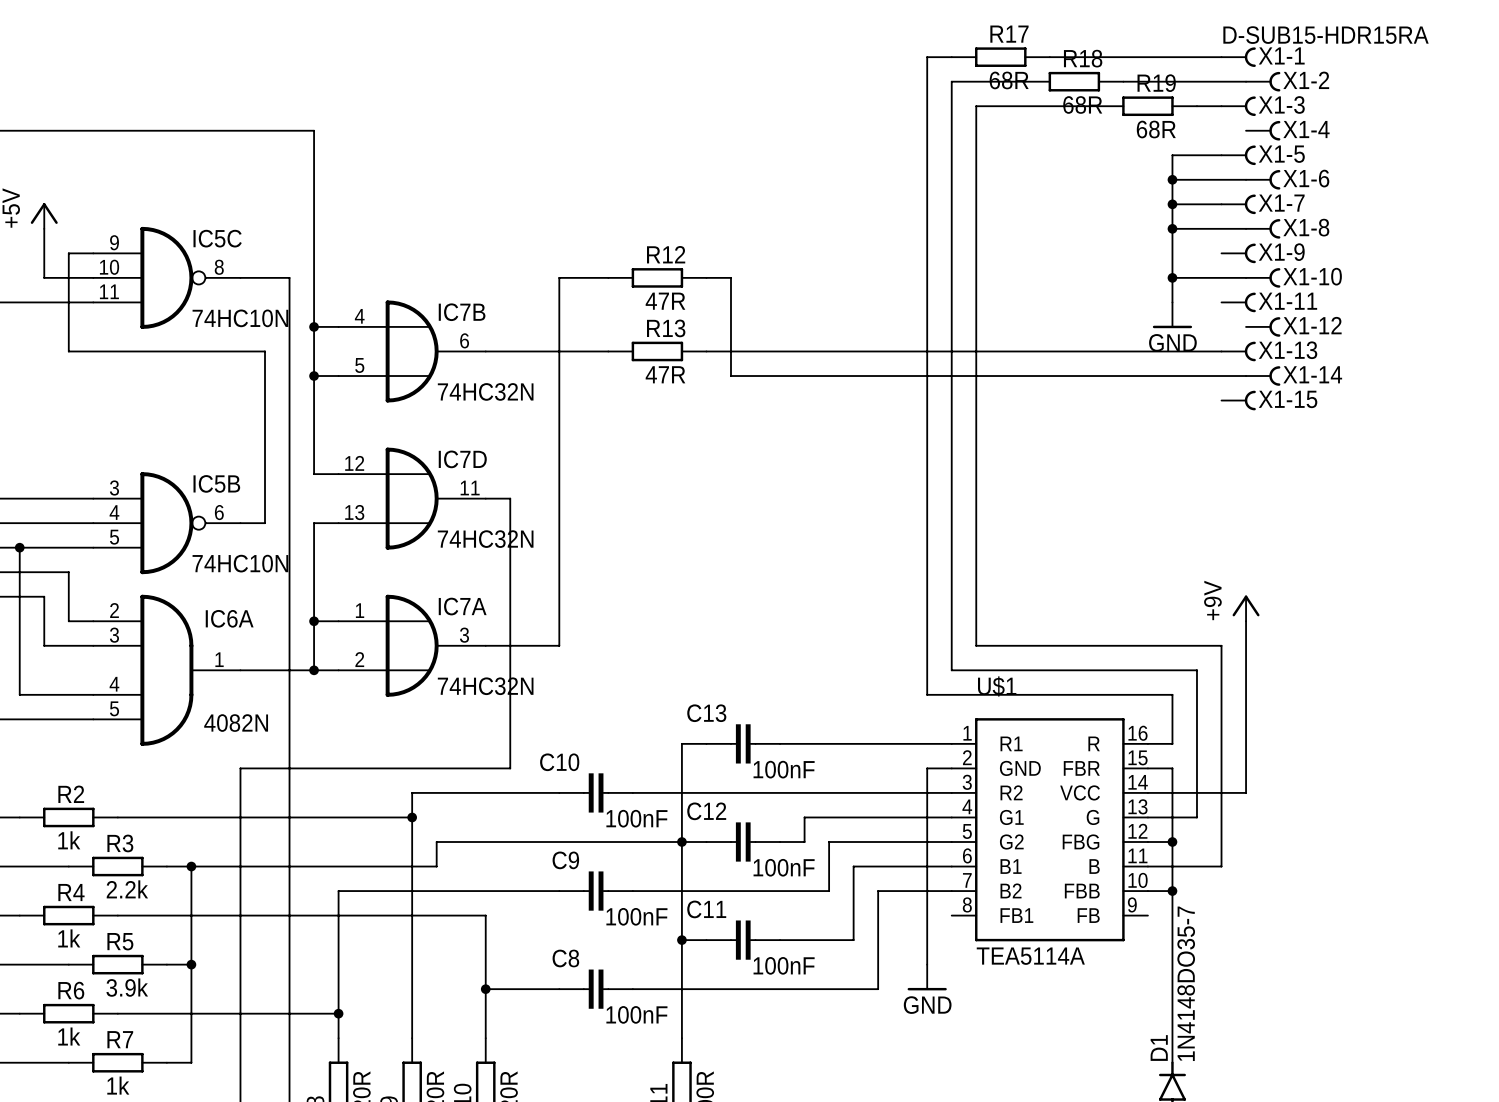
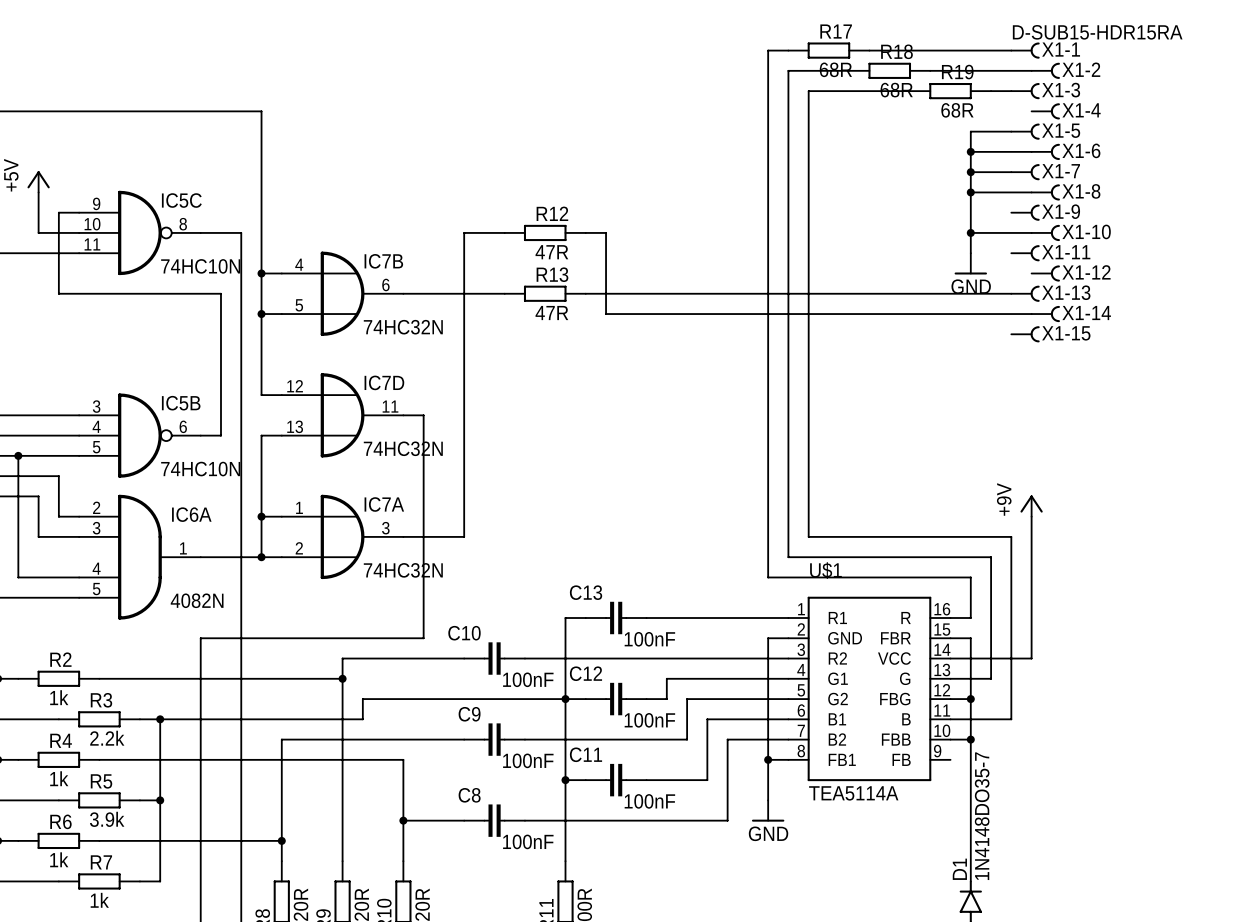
wire: none -> (768, 759) (788, 759)
junction: none -> (768, 759)

